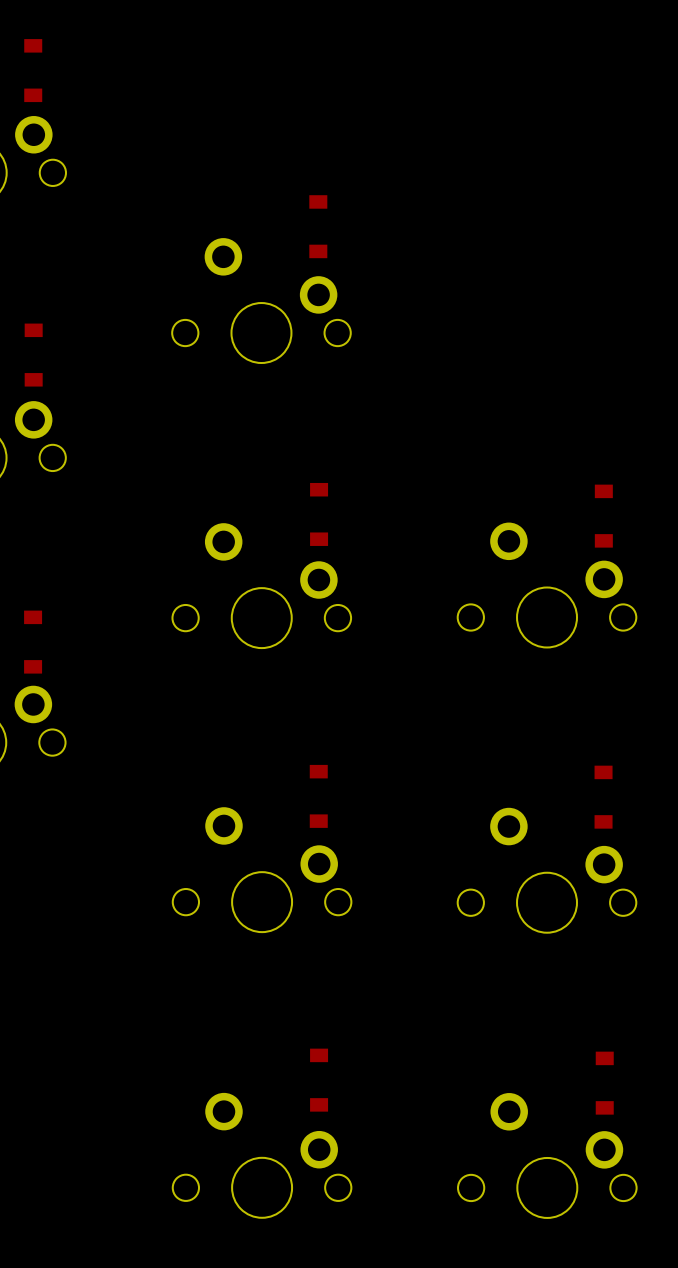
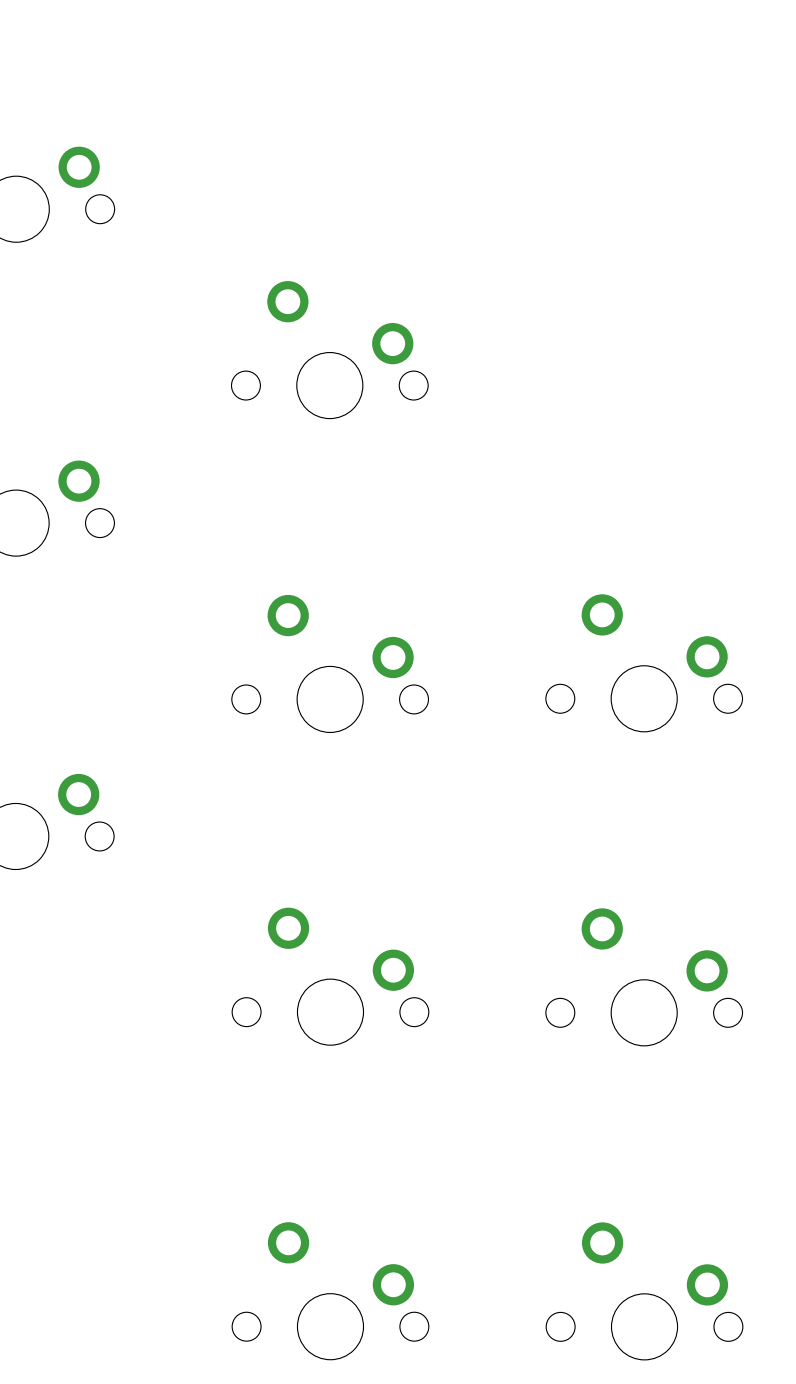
part: (33, 70) -> none
part: (318, 226) -> none
part: (33, 355) -> none
part: (319, 514) -> none
part: (603, 516) -> none
part: (33, 642) -> none
part: (318, 796) -> none
part: (603, 797) -> none
part: (319, 1080) -> none
part: (604, 1083) -> none

